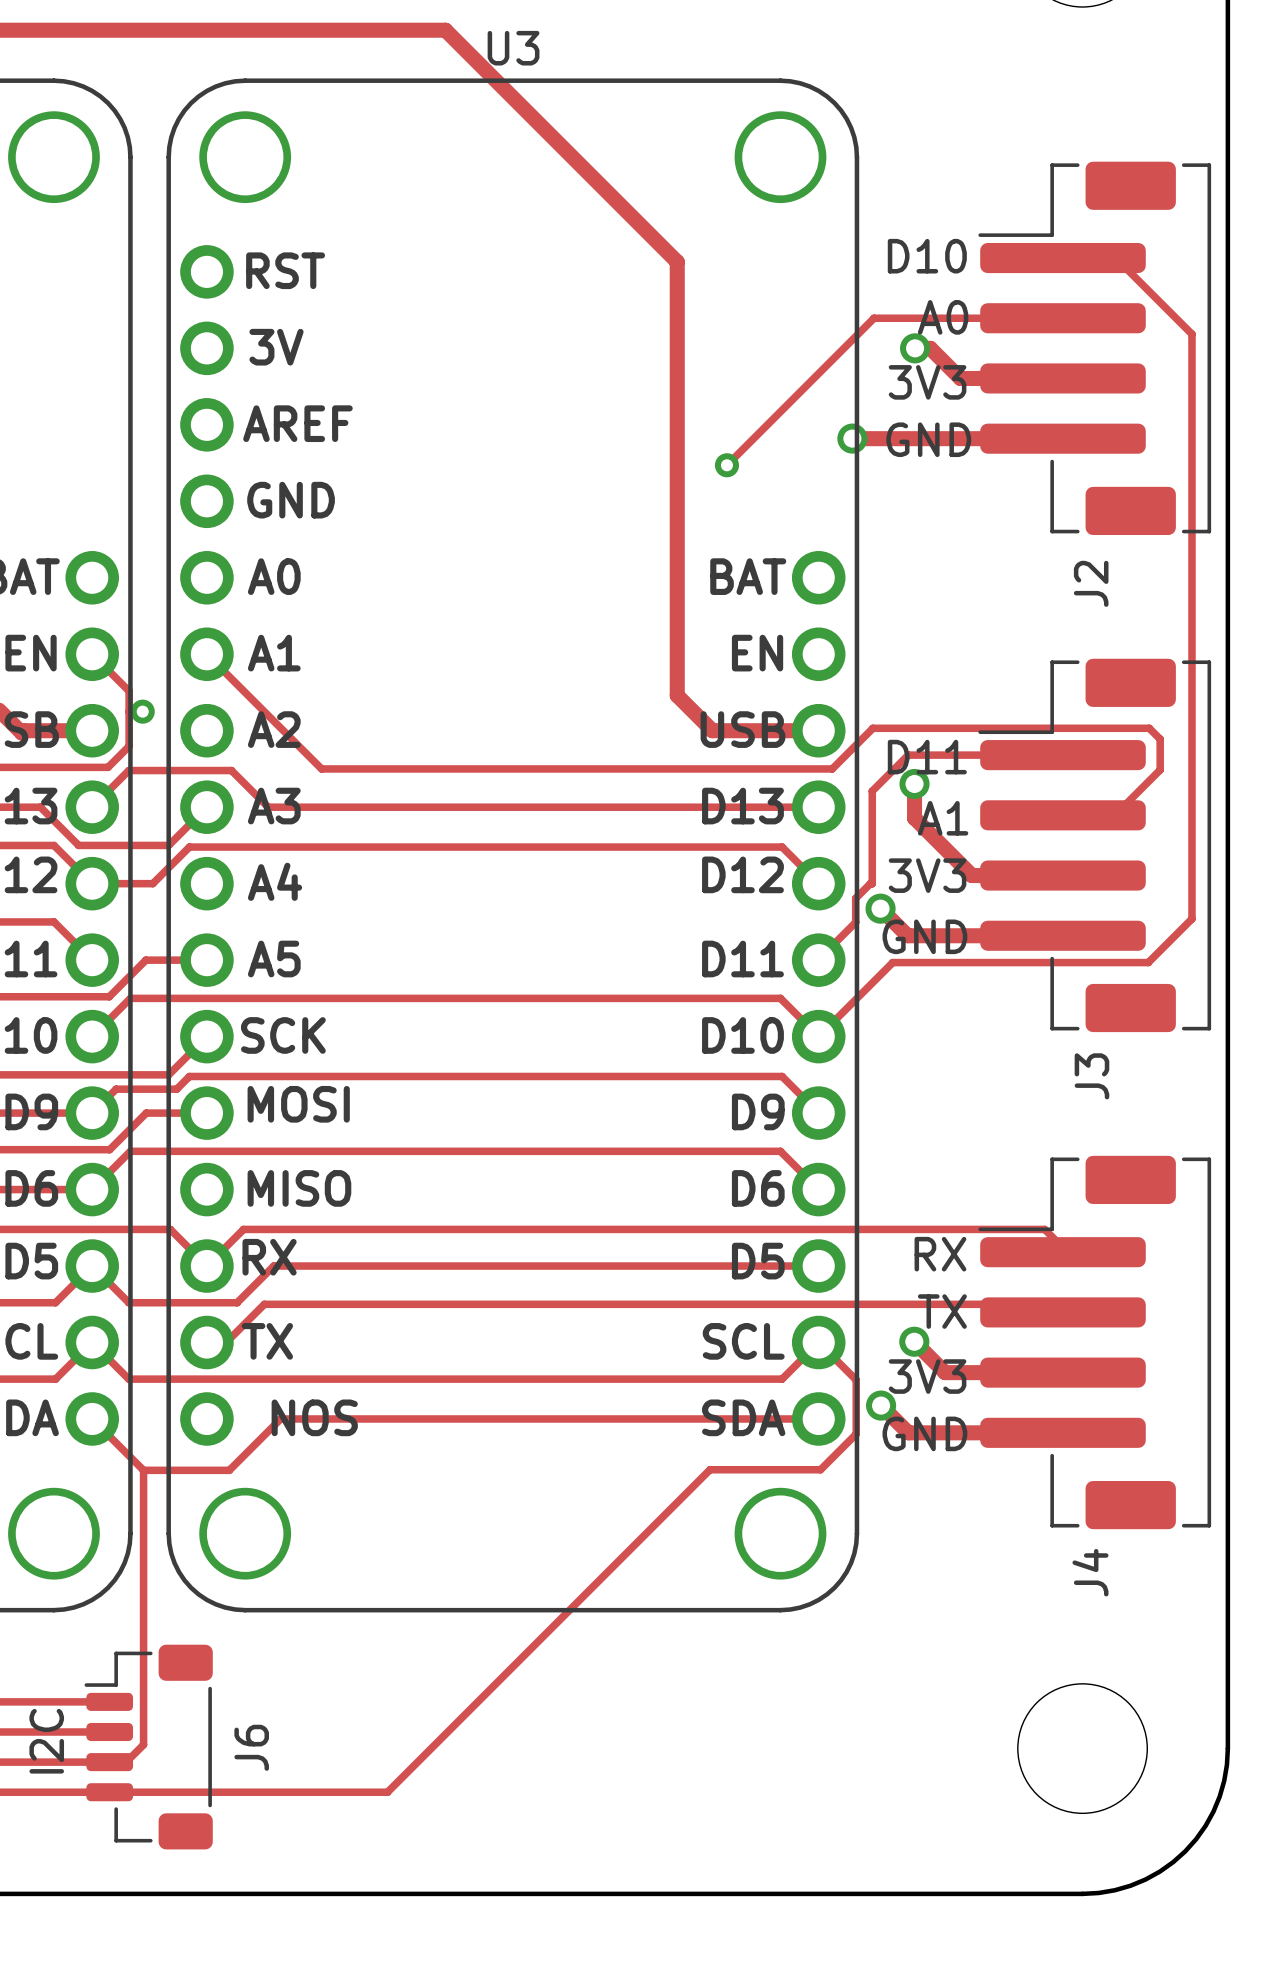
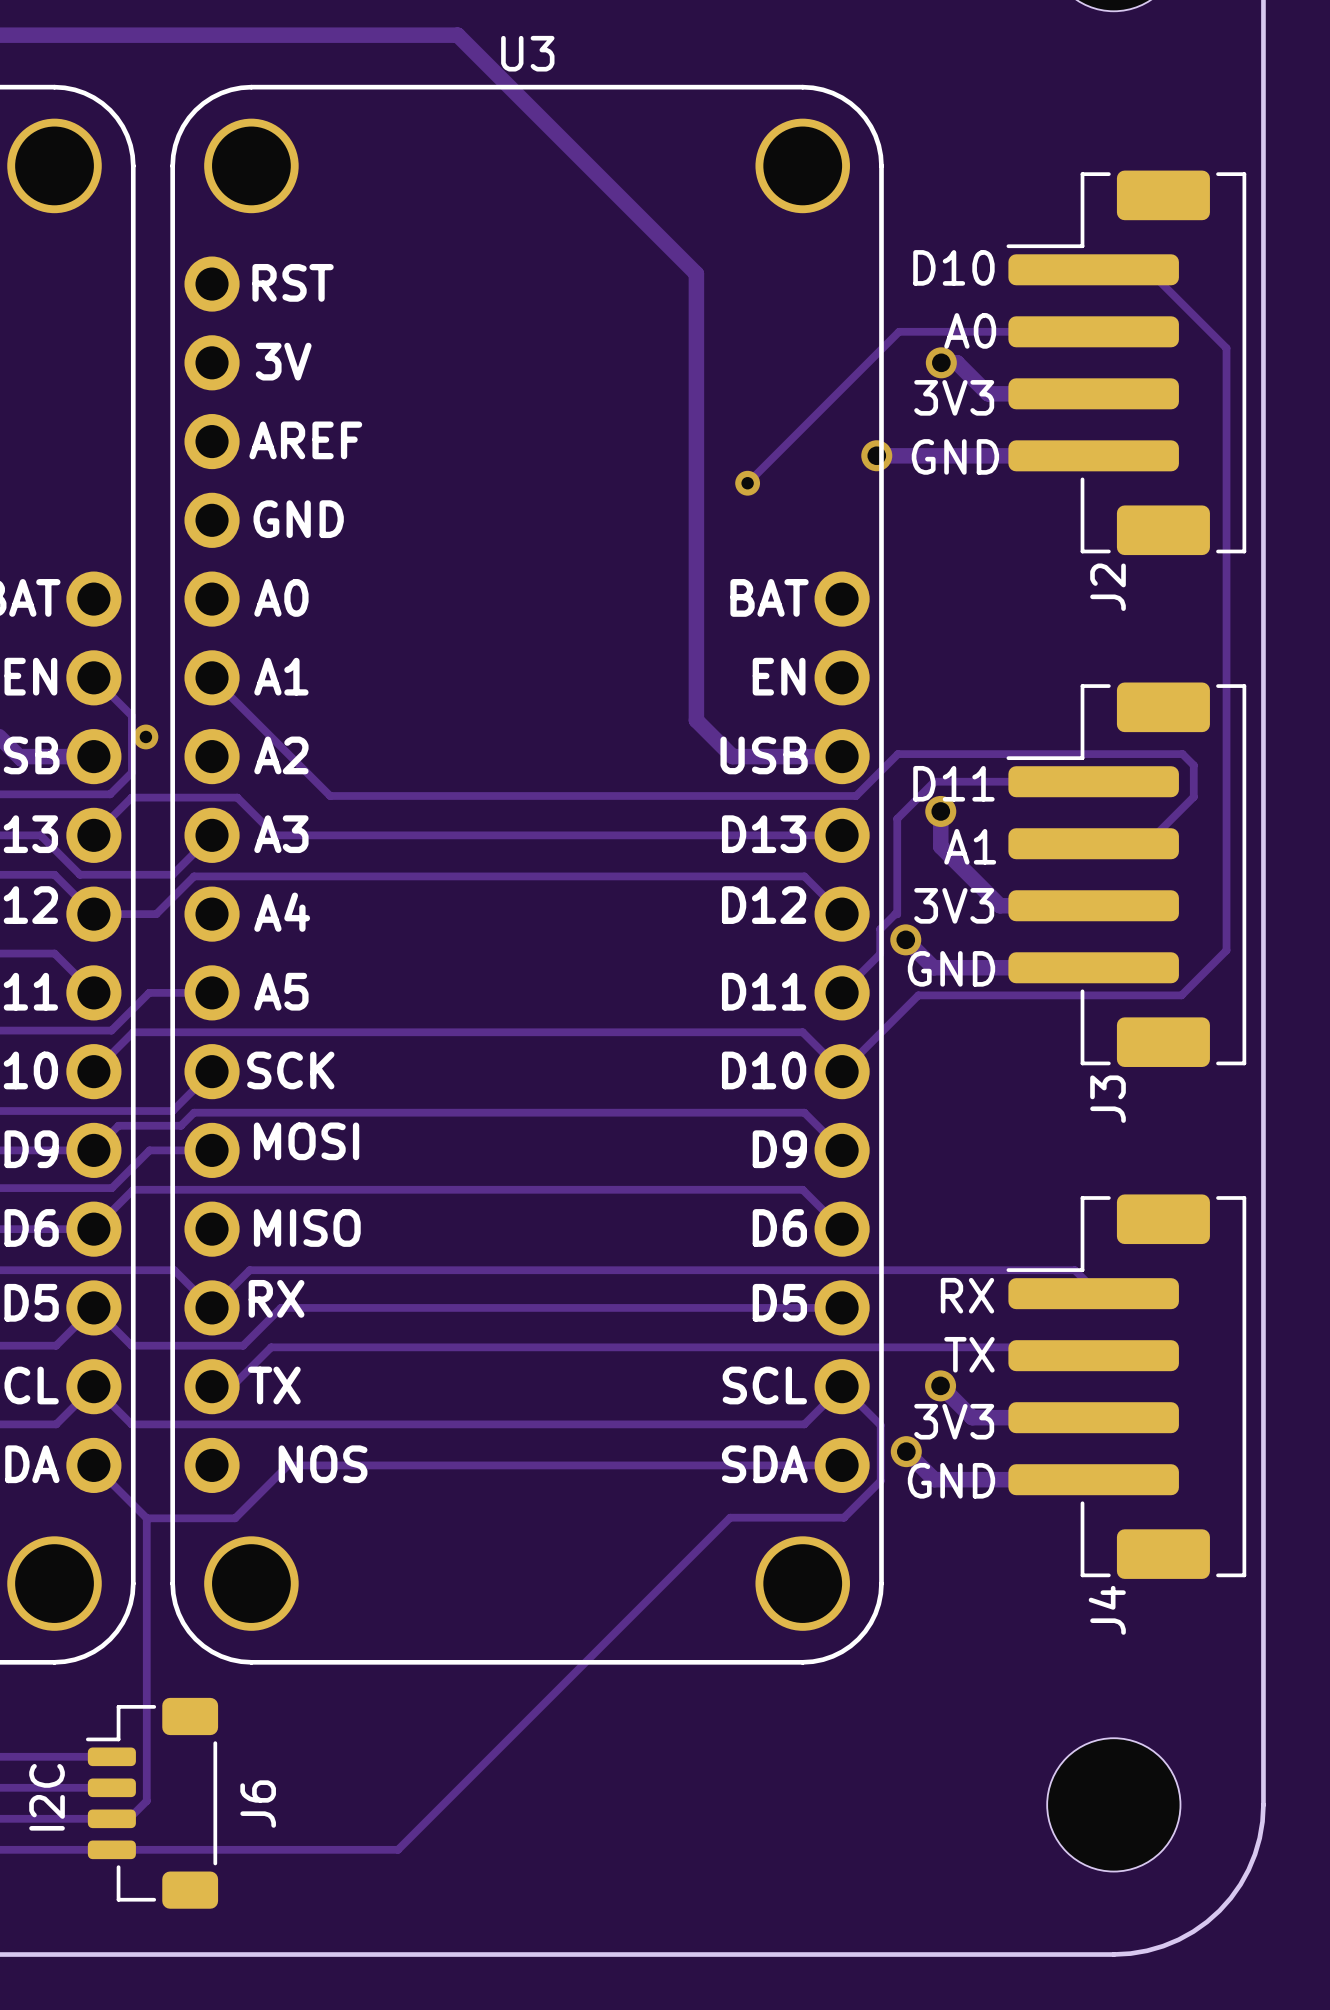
J2 name position: J2 (1091, 583) -> J2 (1108, 587)
J3 name position: J3 (1091, 1076) -> J3 (1108, 1099)
J4 name position: J4 (1090, 1572) -> J4 (1107, 1610)

